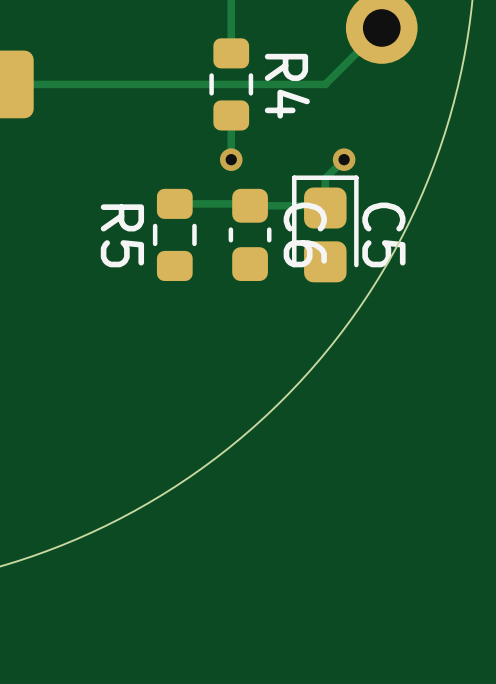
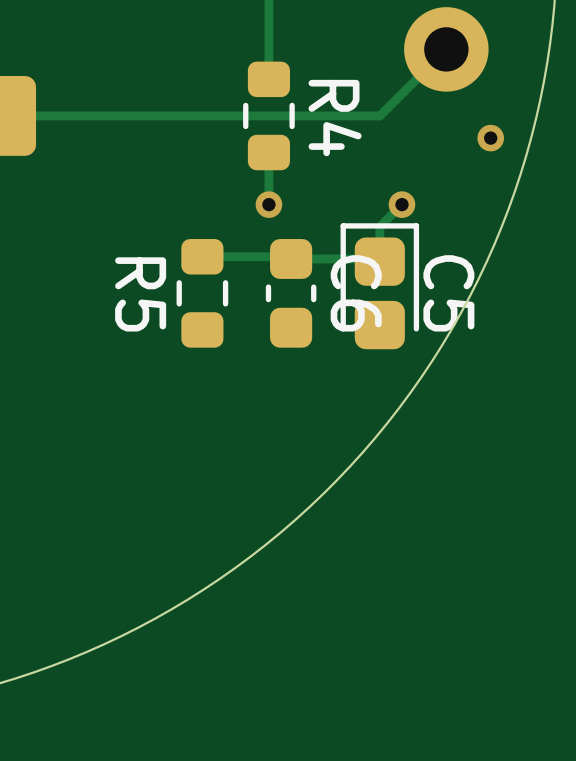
via: none -> (490, 138)

